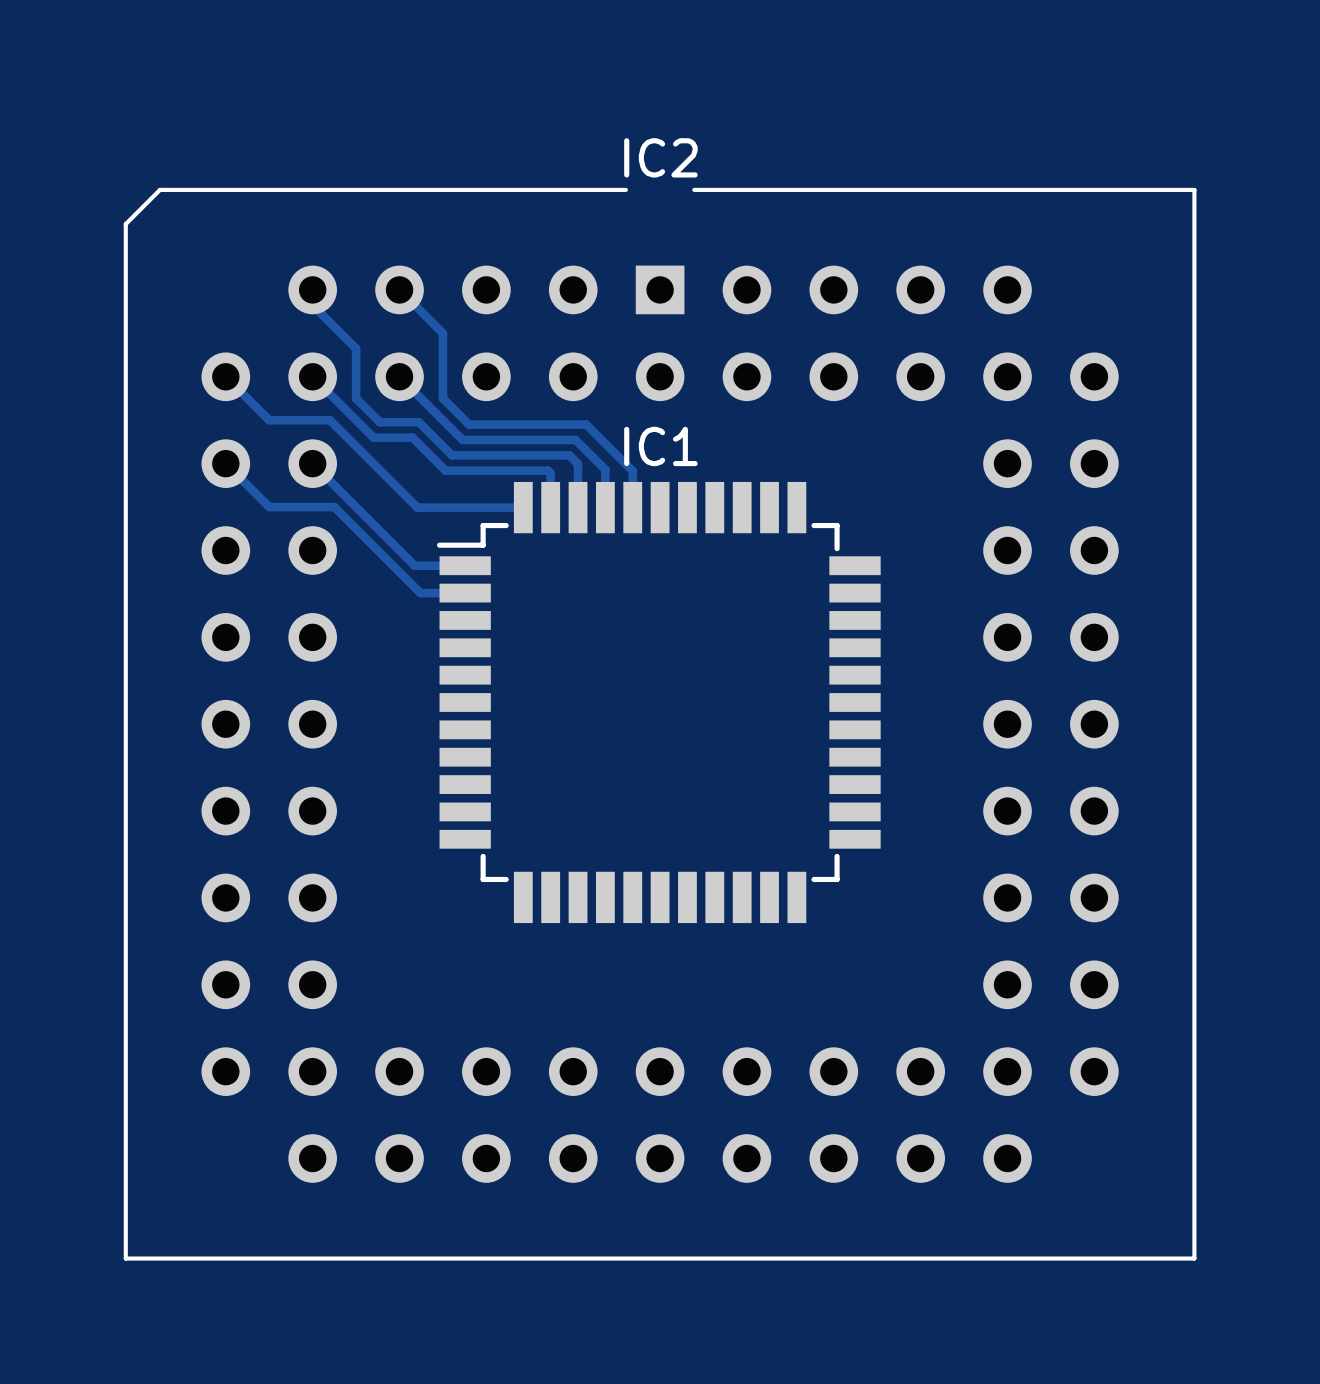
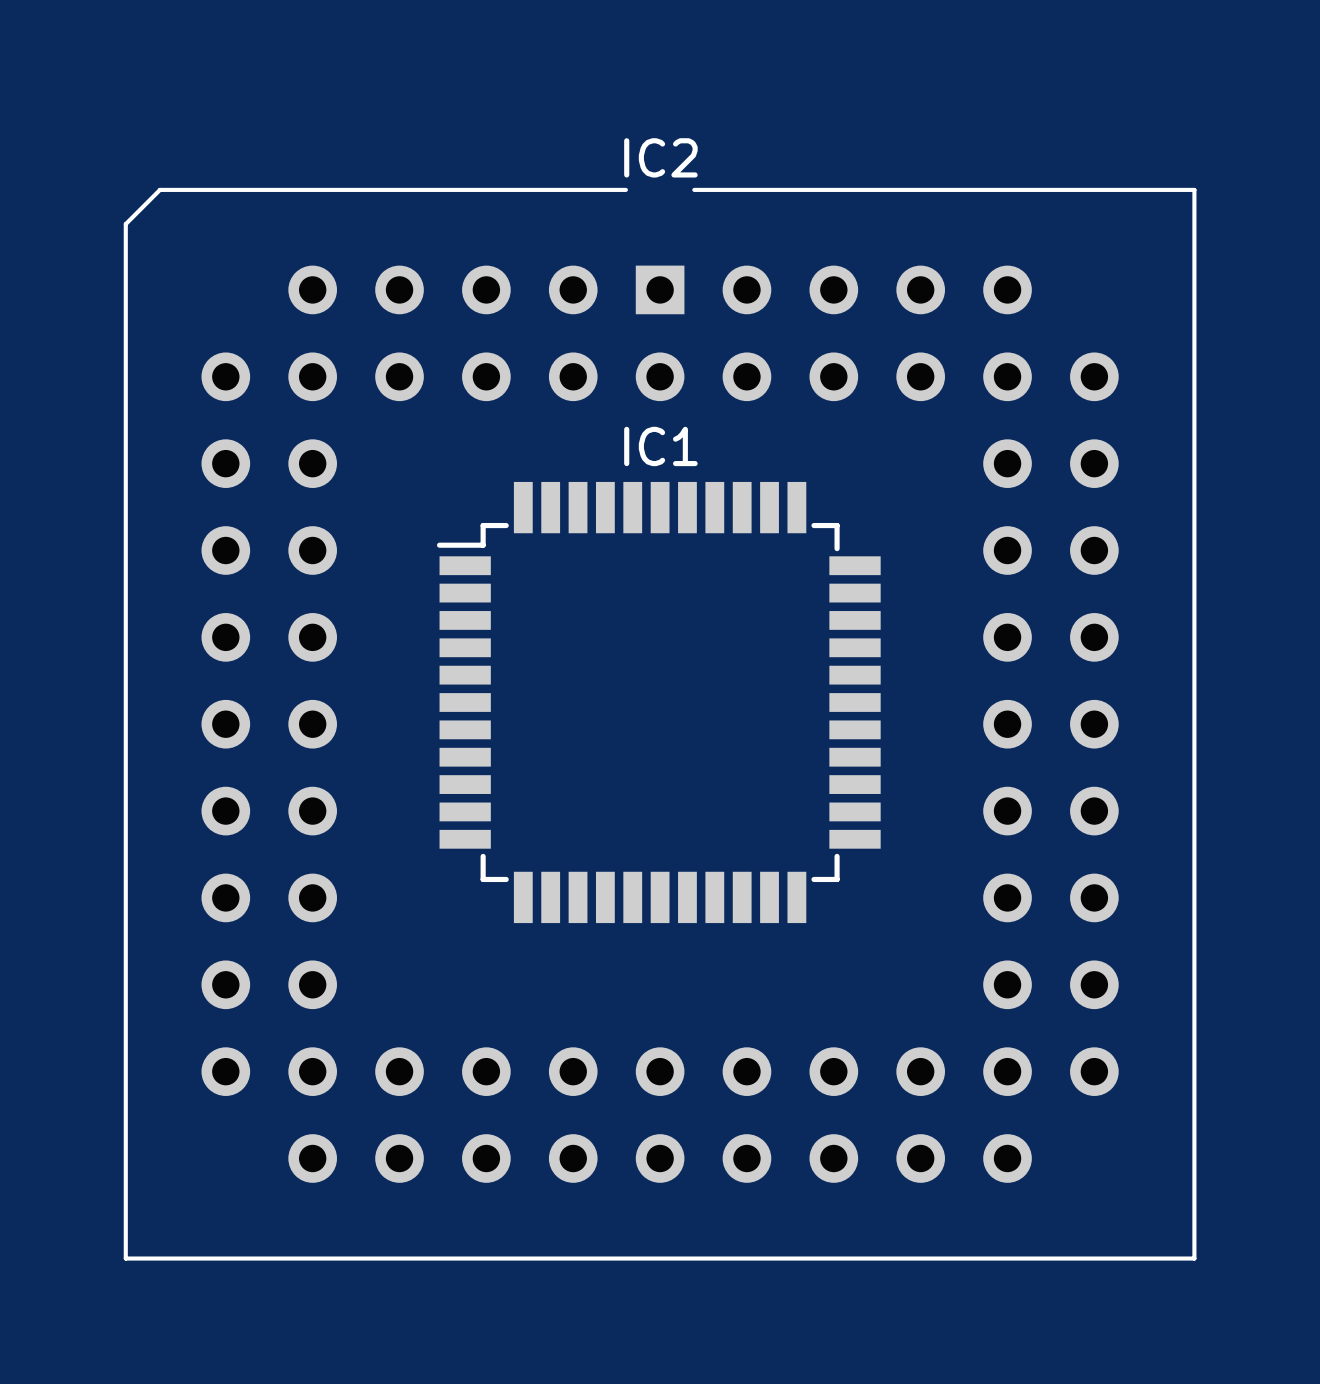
track: (312, 289) (312, 305) (356, 348) (356, 398) (379, 422) (418, 422) (451, 455) (569, 455) (578, 464) (578, 507) -> none
track: (399, 289) (442, 333) (442, 398) (469, 424) (586, 424) (632, 471) (632, 507) -> none
track: (225, 376) (269, 420) (330, 420) (417, 507) (523, 507) -> none
track: (312, 376) (373, 437) (412, 437) (445, 470) (547, 470) (550, 473) (550, 507) -> none
track: (399, 376) (462, 439) (575, 439) (605, 469) (605, 507) -> none
track: (225, 463) (269, 507) (334, 507) (420, 593) (465, 593) -> none
track: (312, 463) (414, 565) (465, 565) -> none

